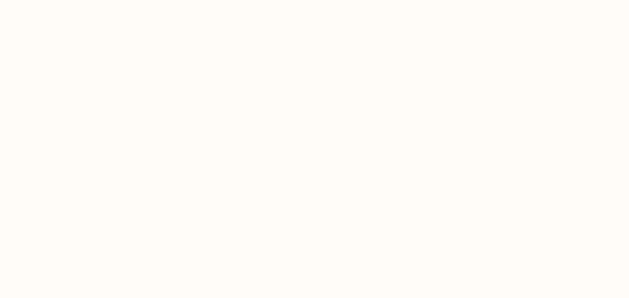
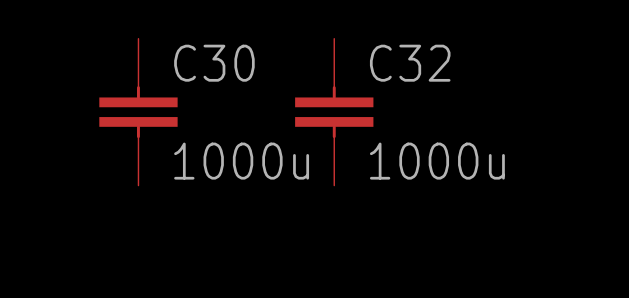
C30: none -> 1000u (138, 112)
C32: none -> 1000u (334, 112)

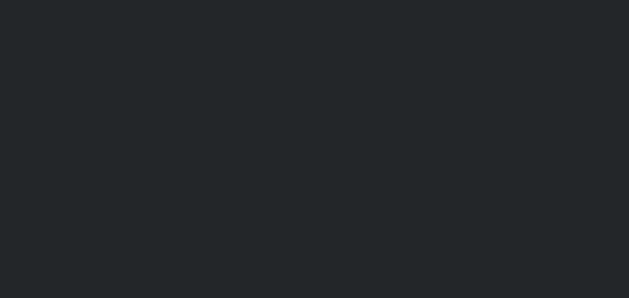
C30: 1000u (138, 112) -> none
C32: 1000u (334, 112) -> none

